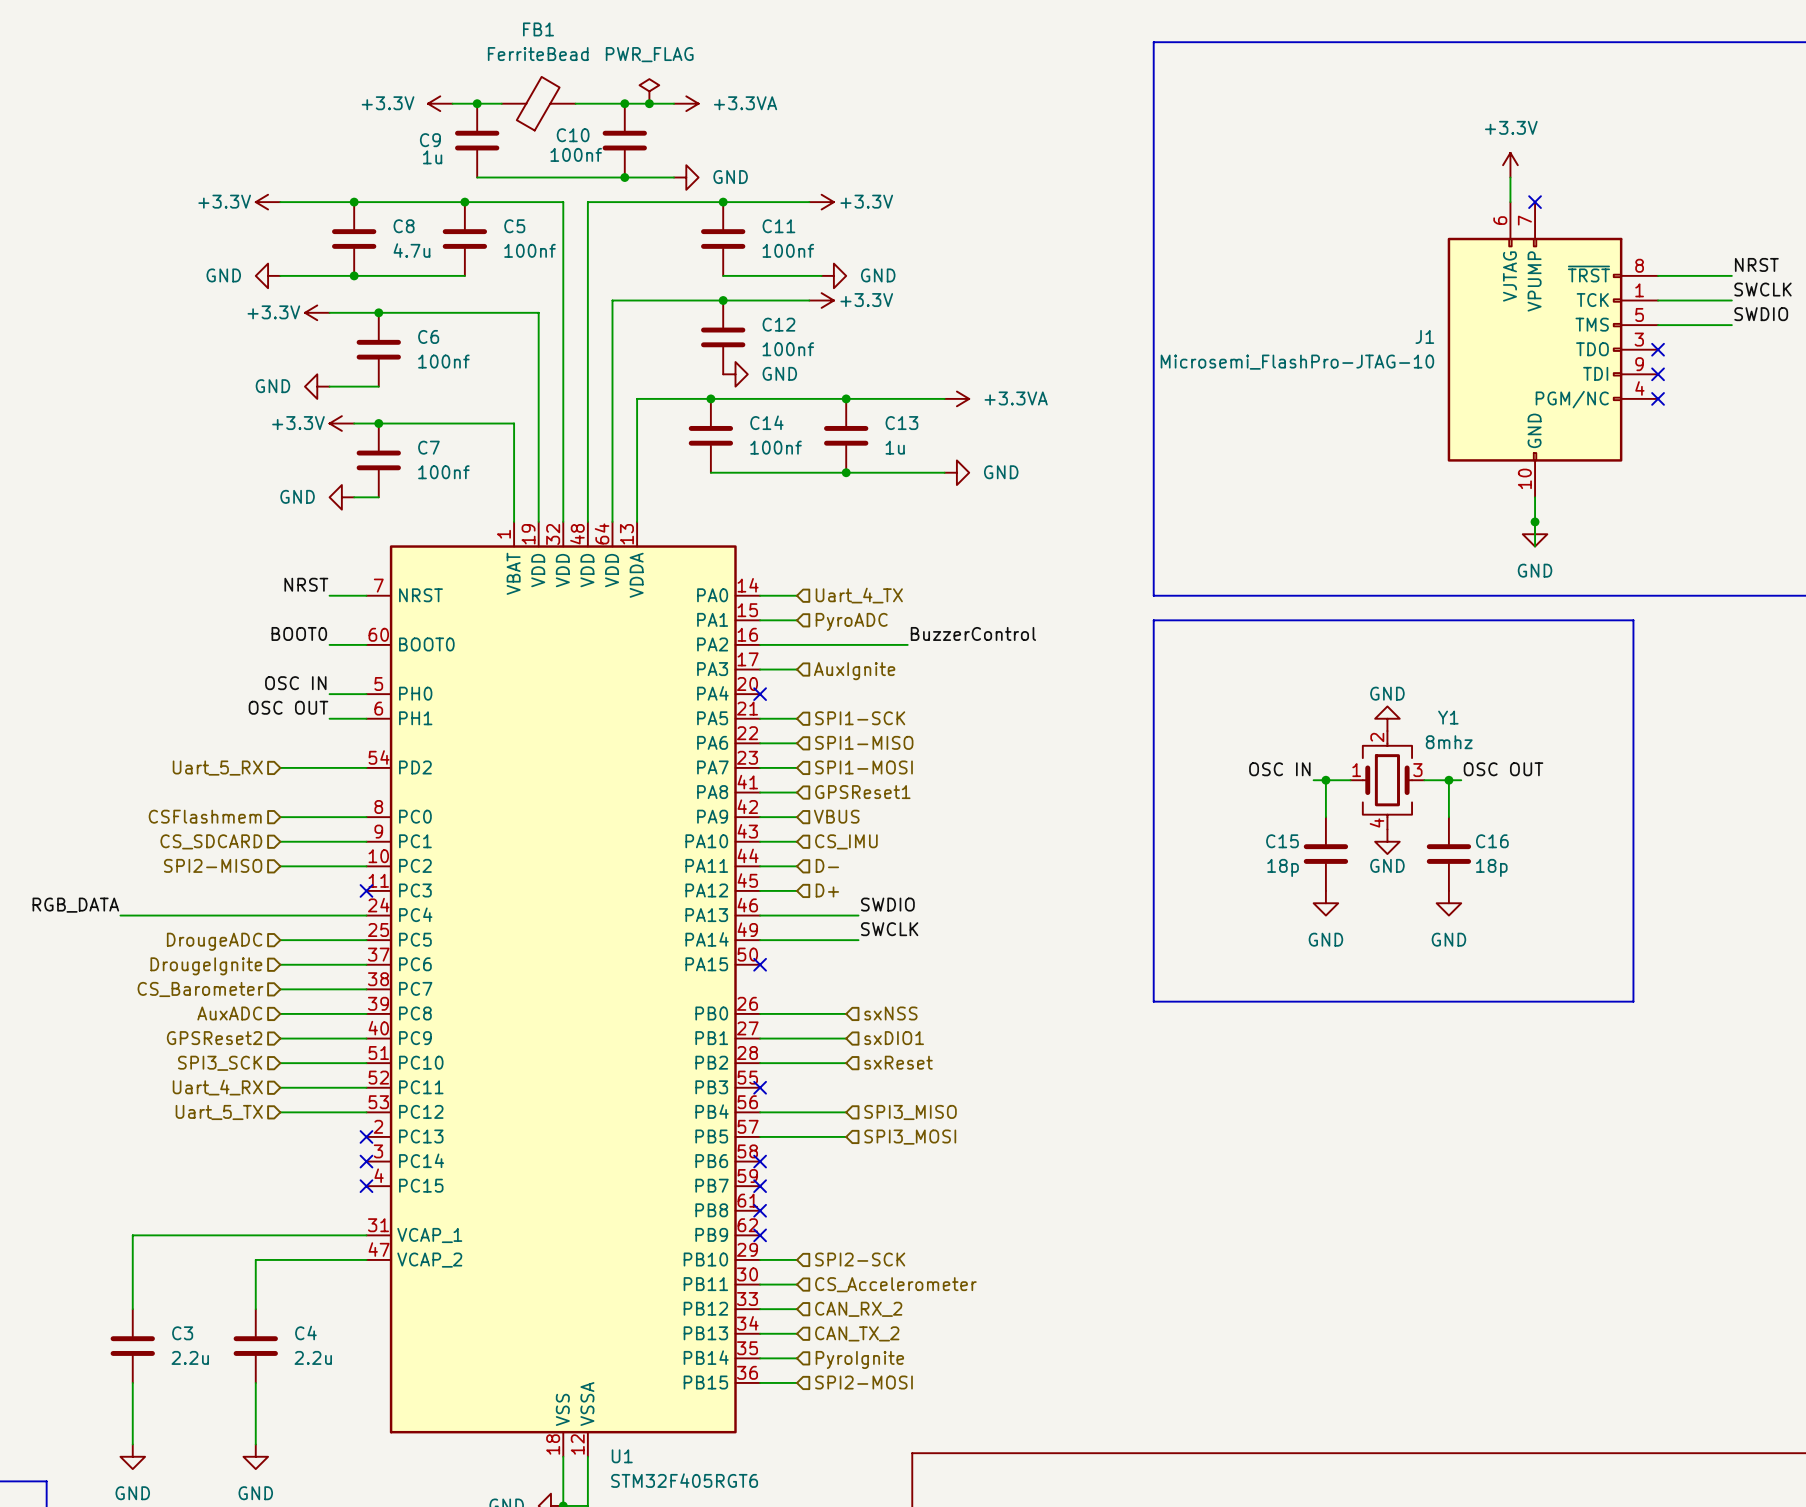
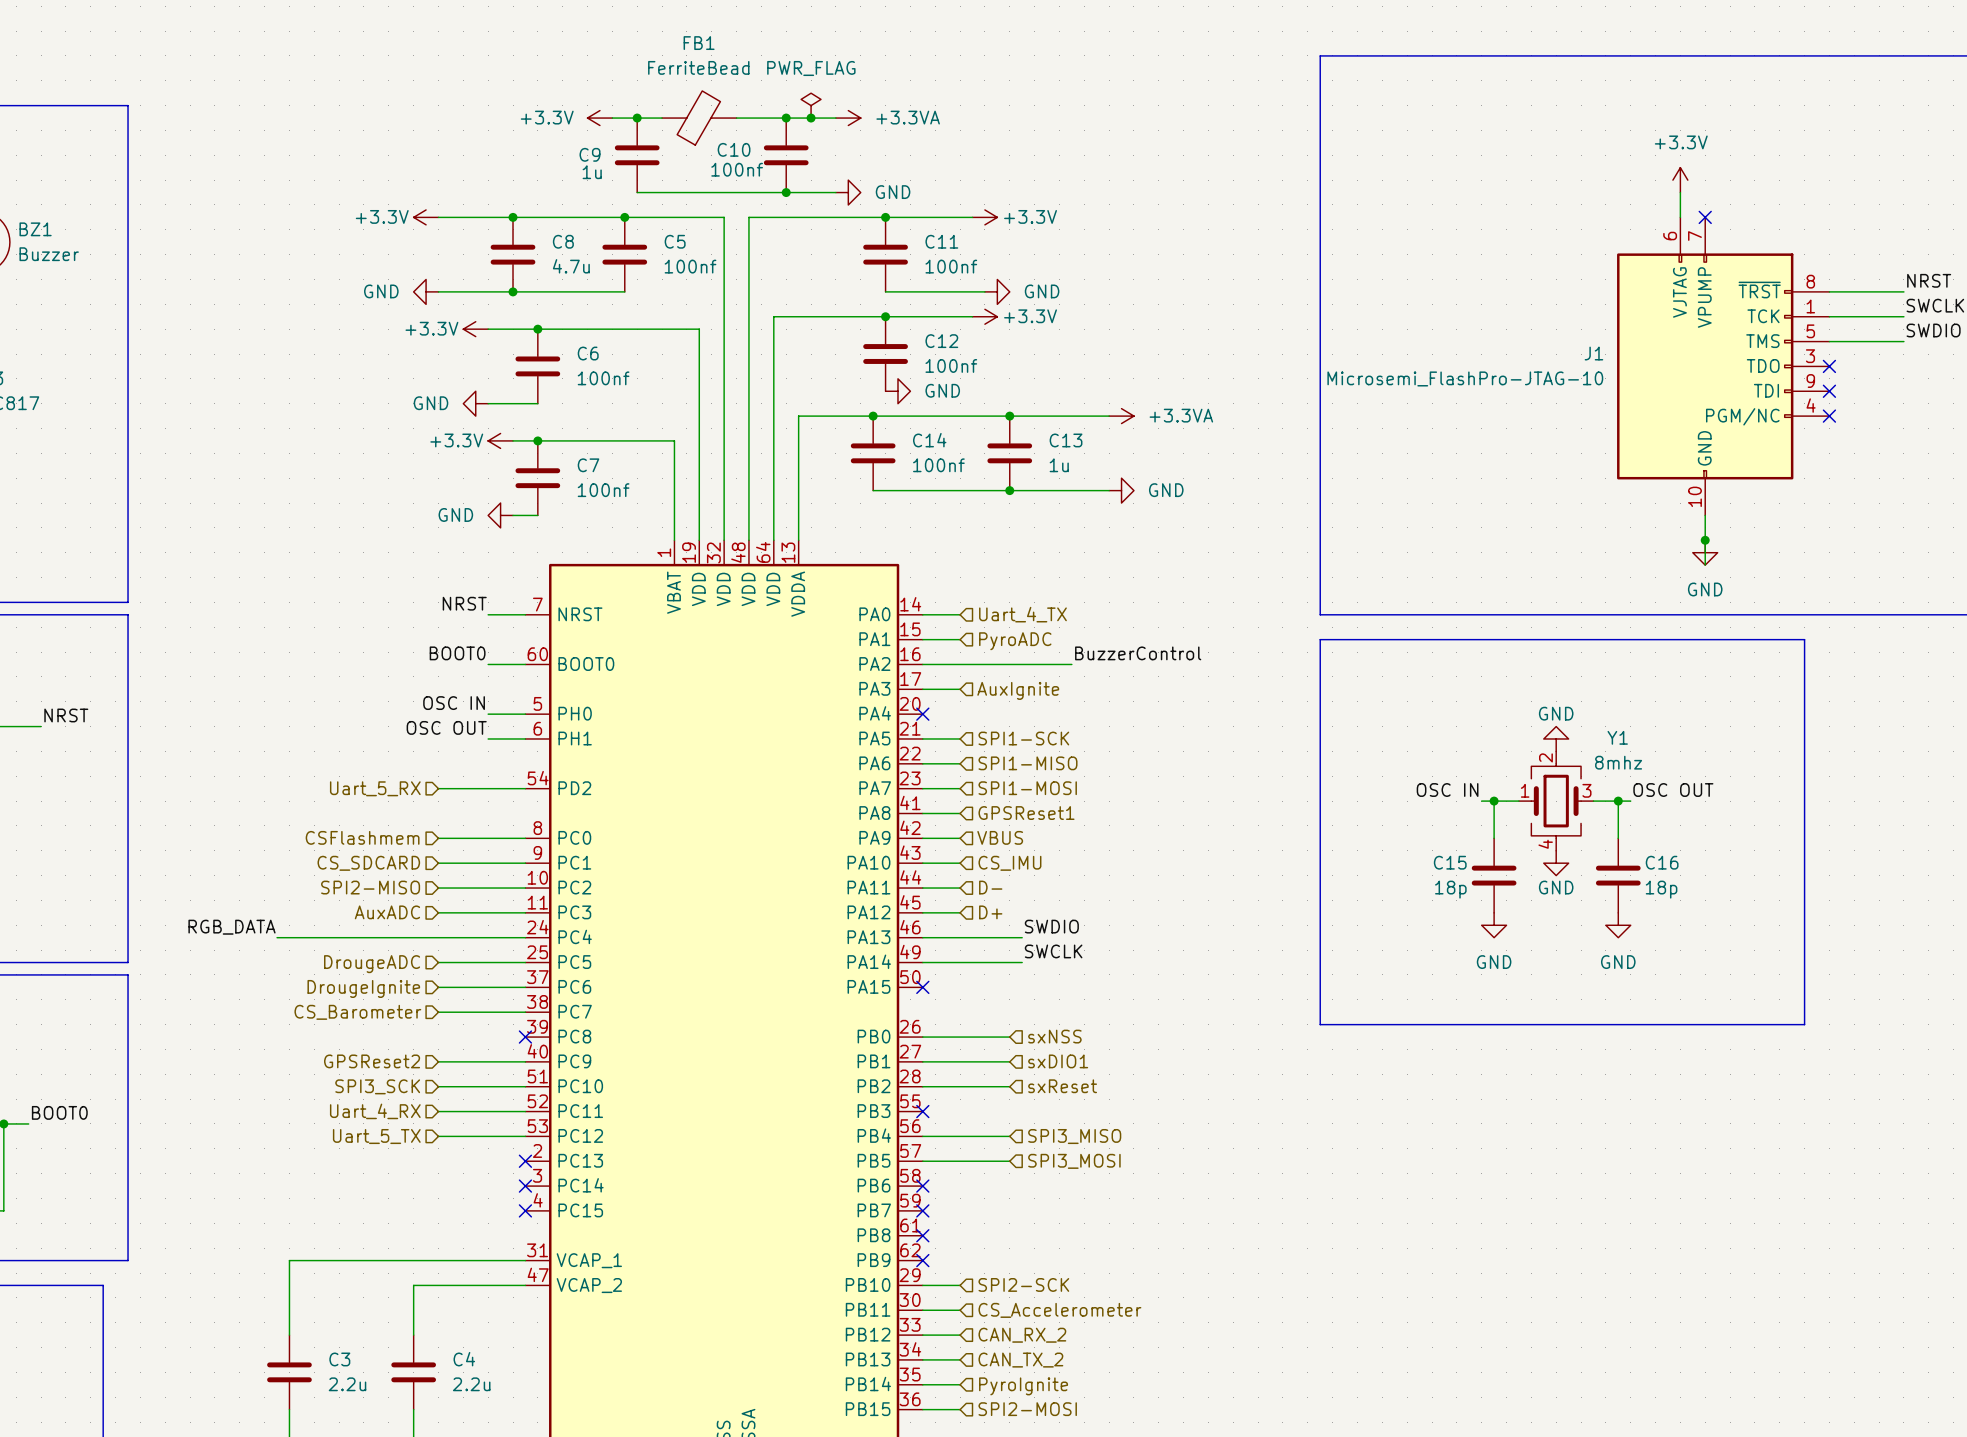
no-connect mark: (366, 890) -> none
hierarchical label position: AuxADC (229, 1013) -> AuxADC (387, 912)
wire: (280, 1013) (366, 1013) -> (438, 912) (525, 912)
no-connect mark: none -> (525, 1037)

